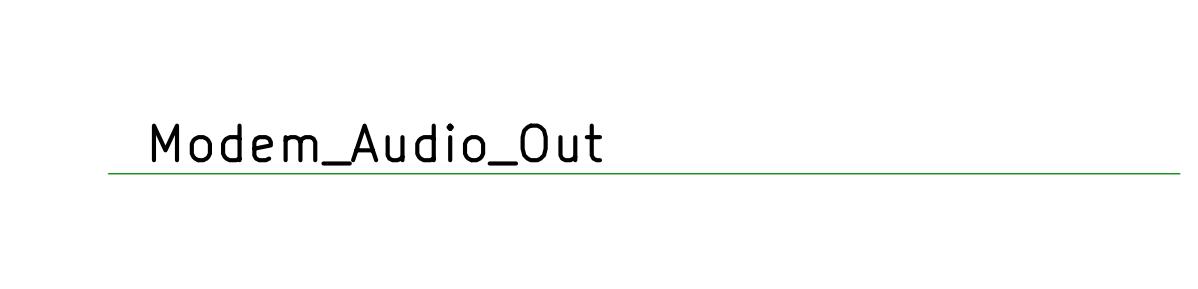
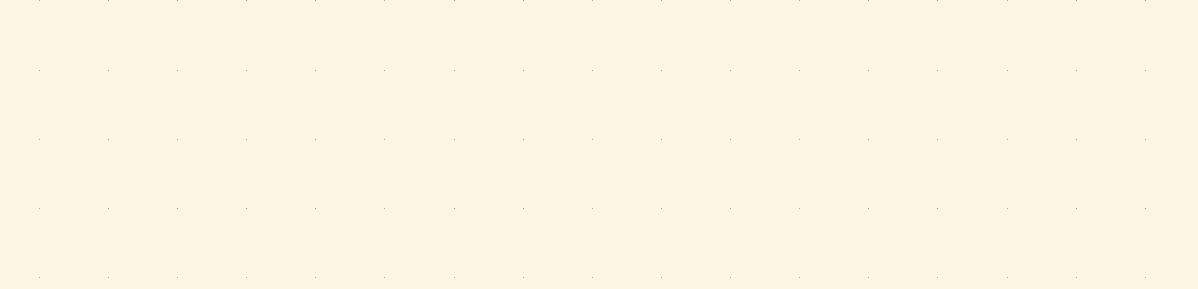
label: Modem_Audio_Out (376, 144) -> none
wire: (108, 173) (1179, 173) -> none

